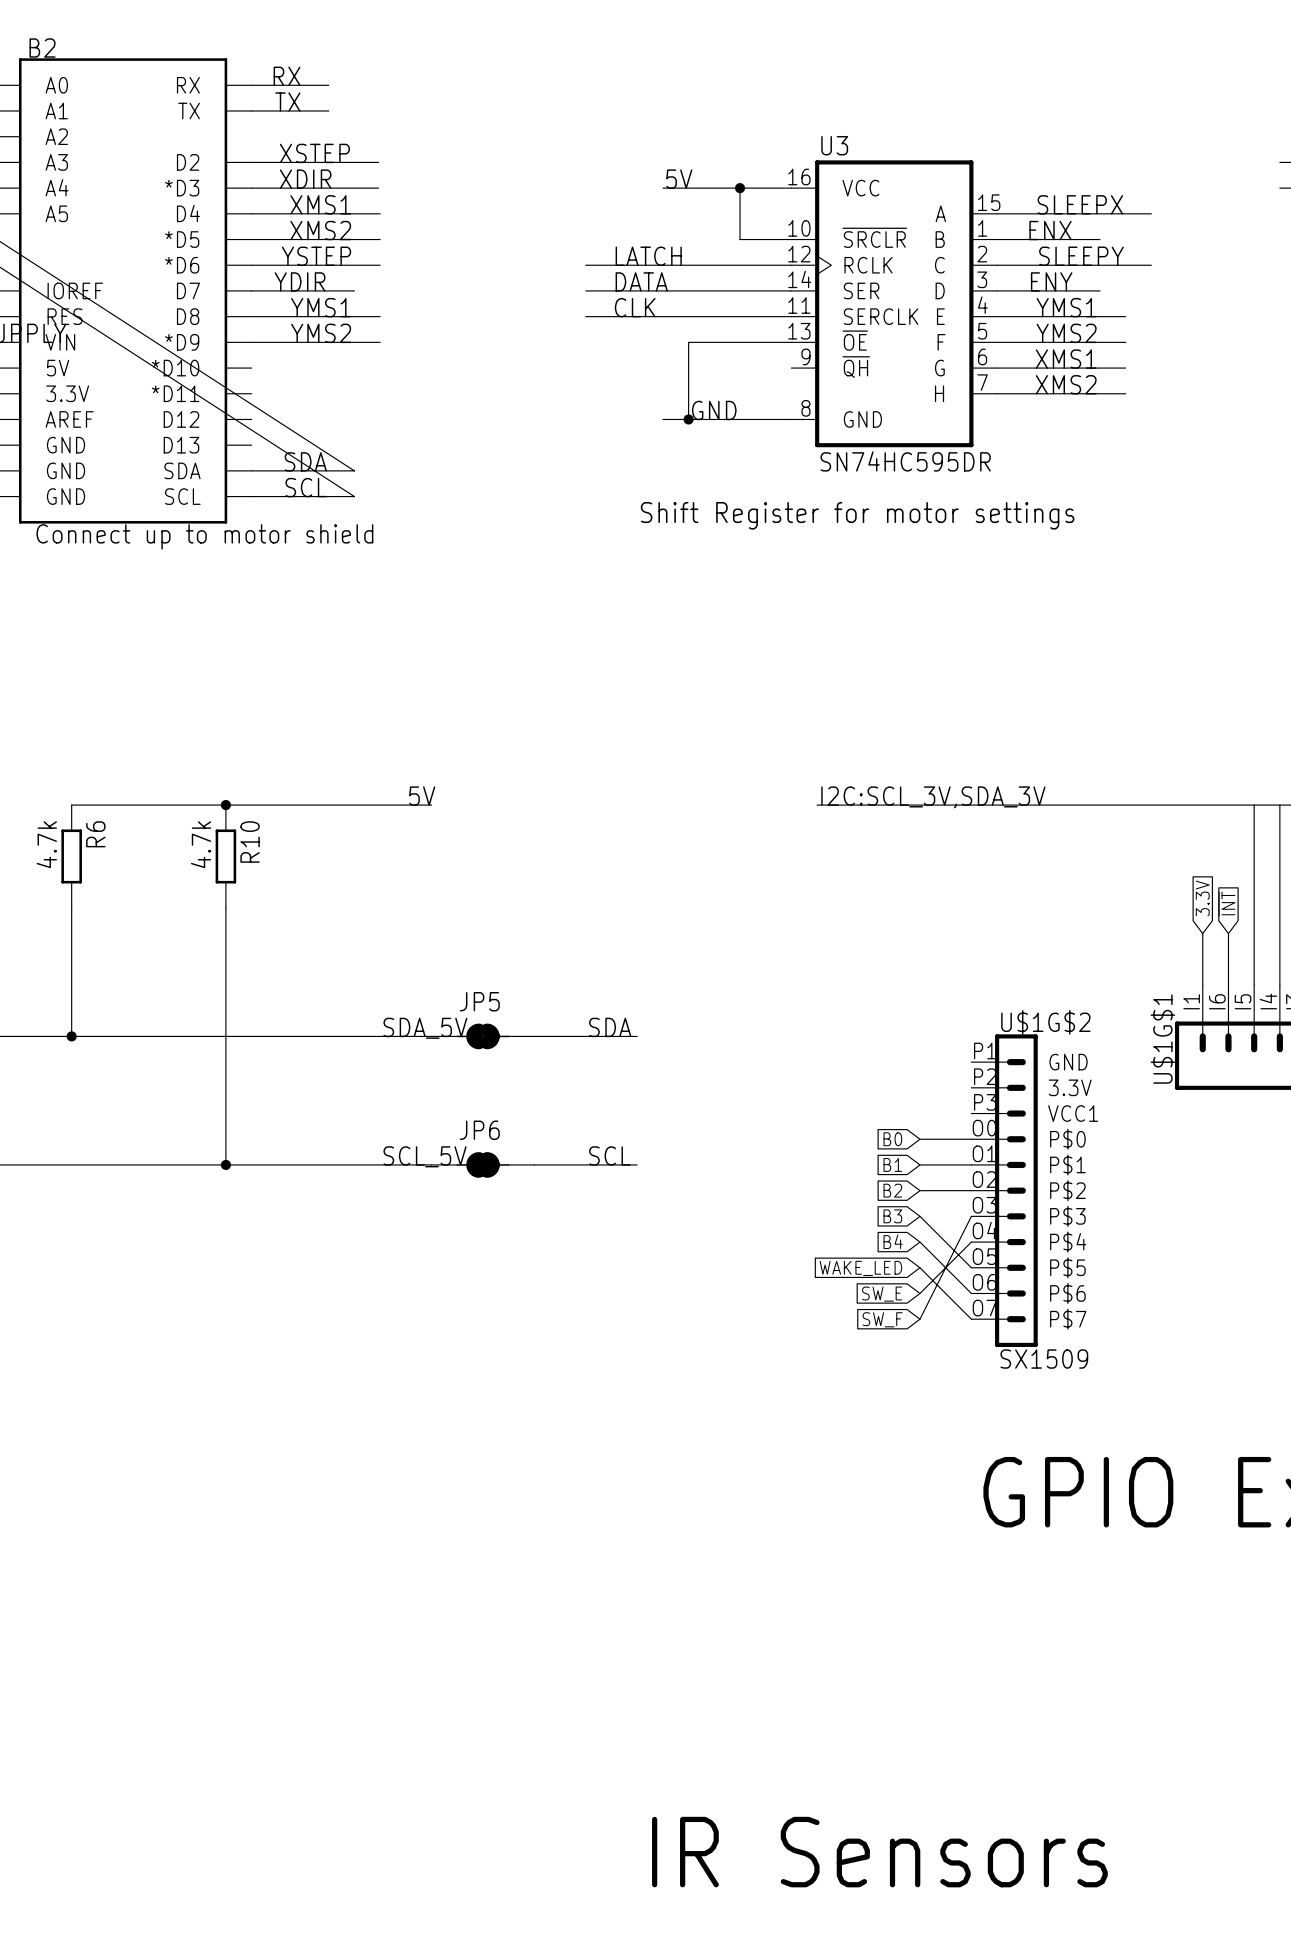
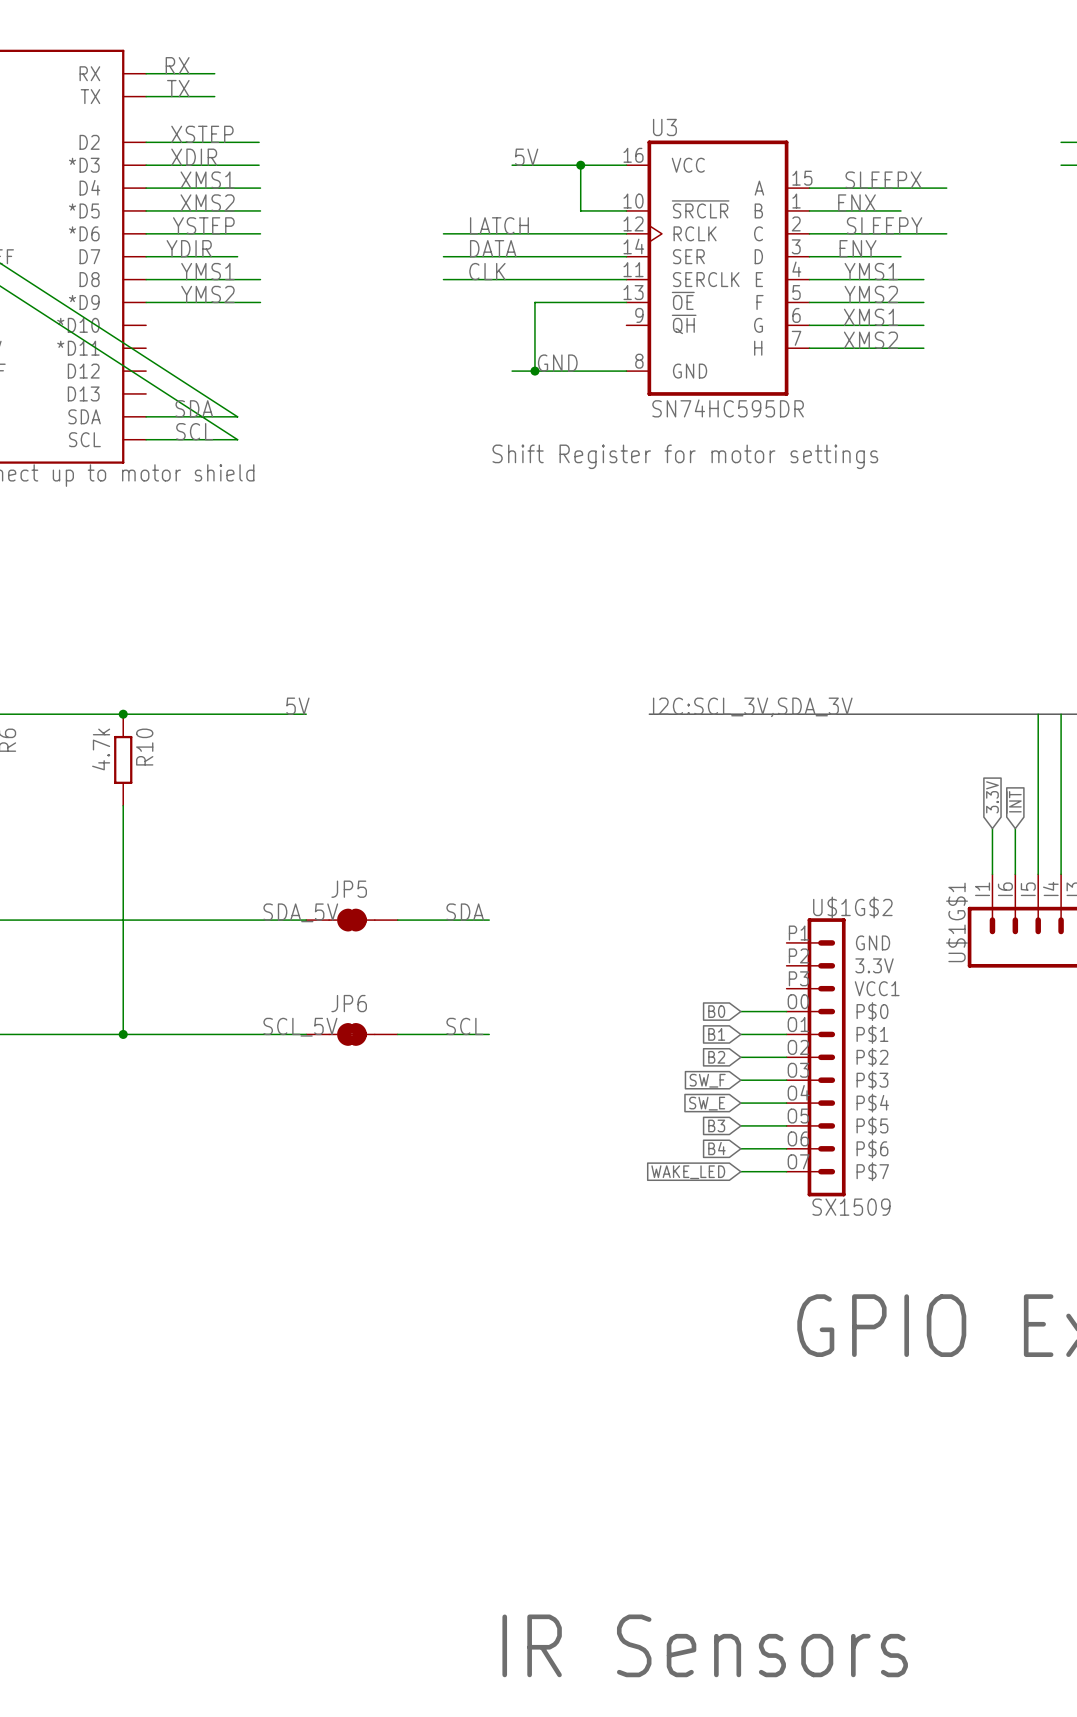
global label: B3 (892, 1216) -> SW_F (707, 1080)
wire: (919, 1216) (971, 1267) -> (740, 1080) (786, 1080)
wire: (971, 1216) (919, 1319) -> (786, 1171) (740, 1171)
global label: B4 (893, 1241) -> SW_E (707, 1103)
wire: (919, 1242) (971, 1293) -> (740, 1103) (786, 1103)
wire: (971, 1242) (919, 1293) -> (786, 1148) (740, 1148)
wire: (919, 1267) (971, 1319) -> (740, 1125) (786, 1125)
global label: WAKE_LED (860, 1268) -> B3 (716, 1125)
global label: SW_E (882, 1294) -> B4 (716, 1148)
global label: SW_F (882, 1319) -> WAKE_LED (688, 1172)

